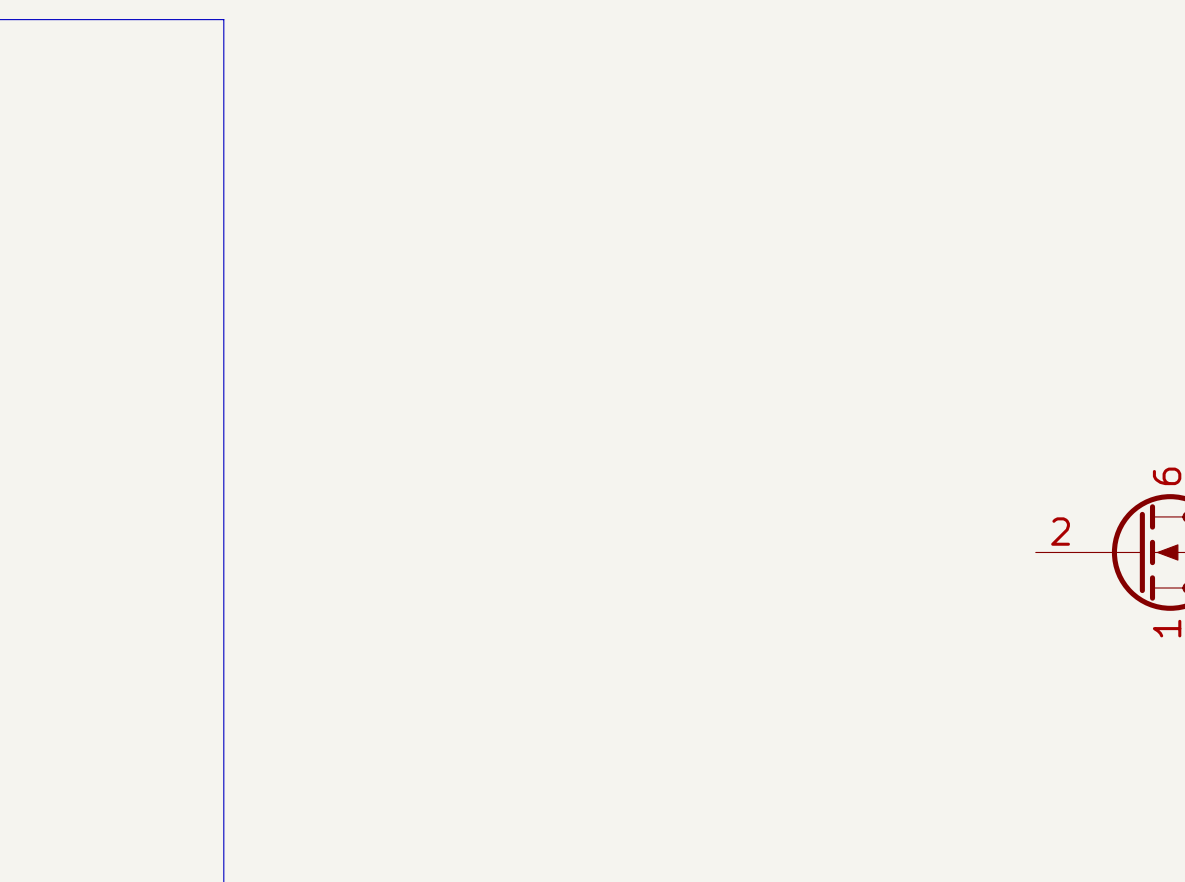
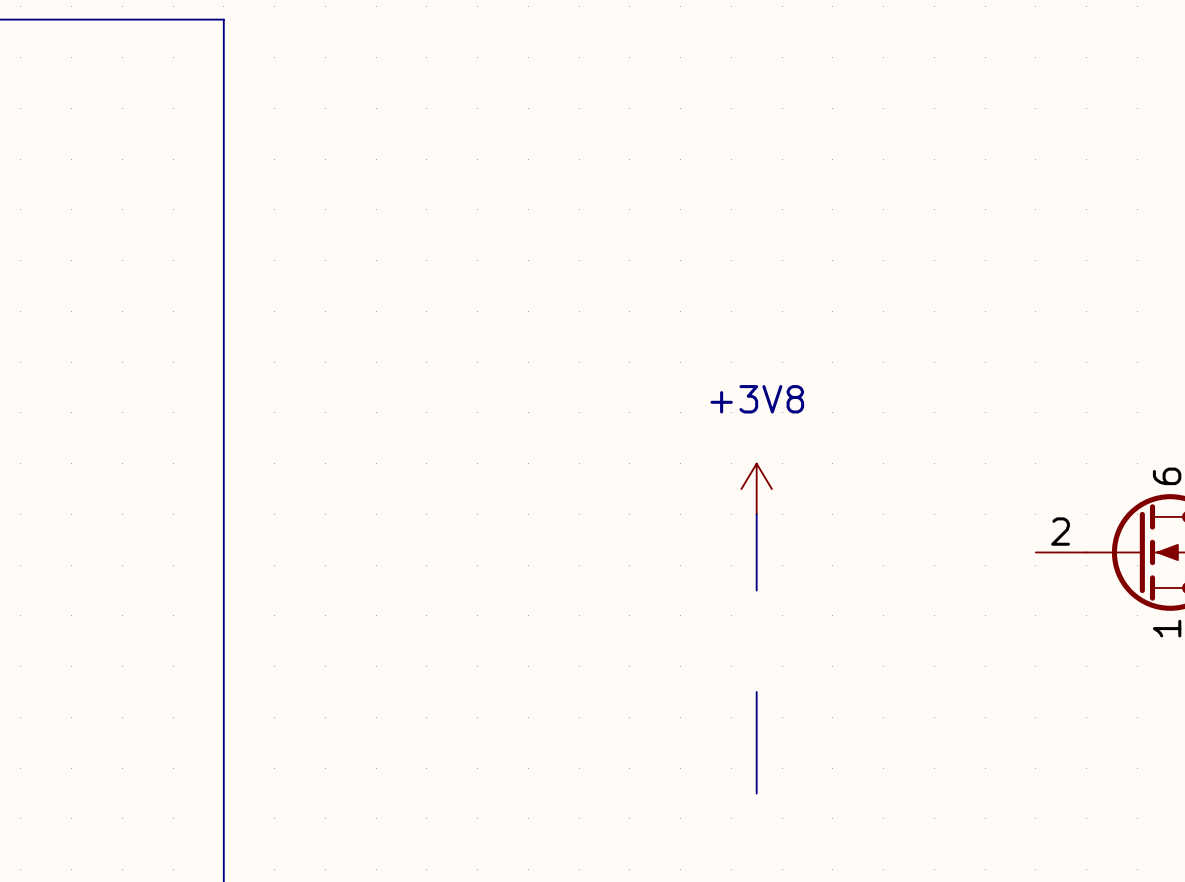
power symbol: none -> +3V8 (756, 489)
wire: none -> (756, 514) (756, 590)
wire: none -> (756, 692) (756, 793)

